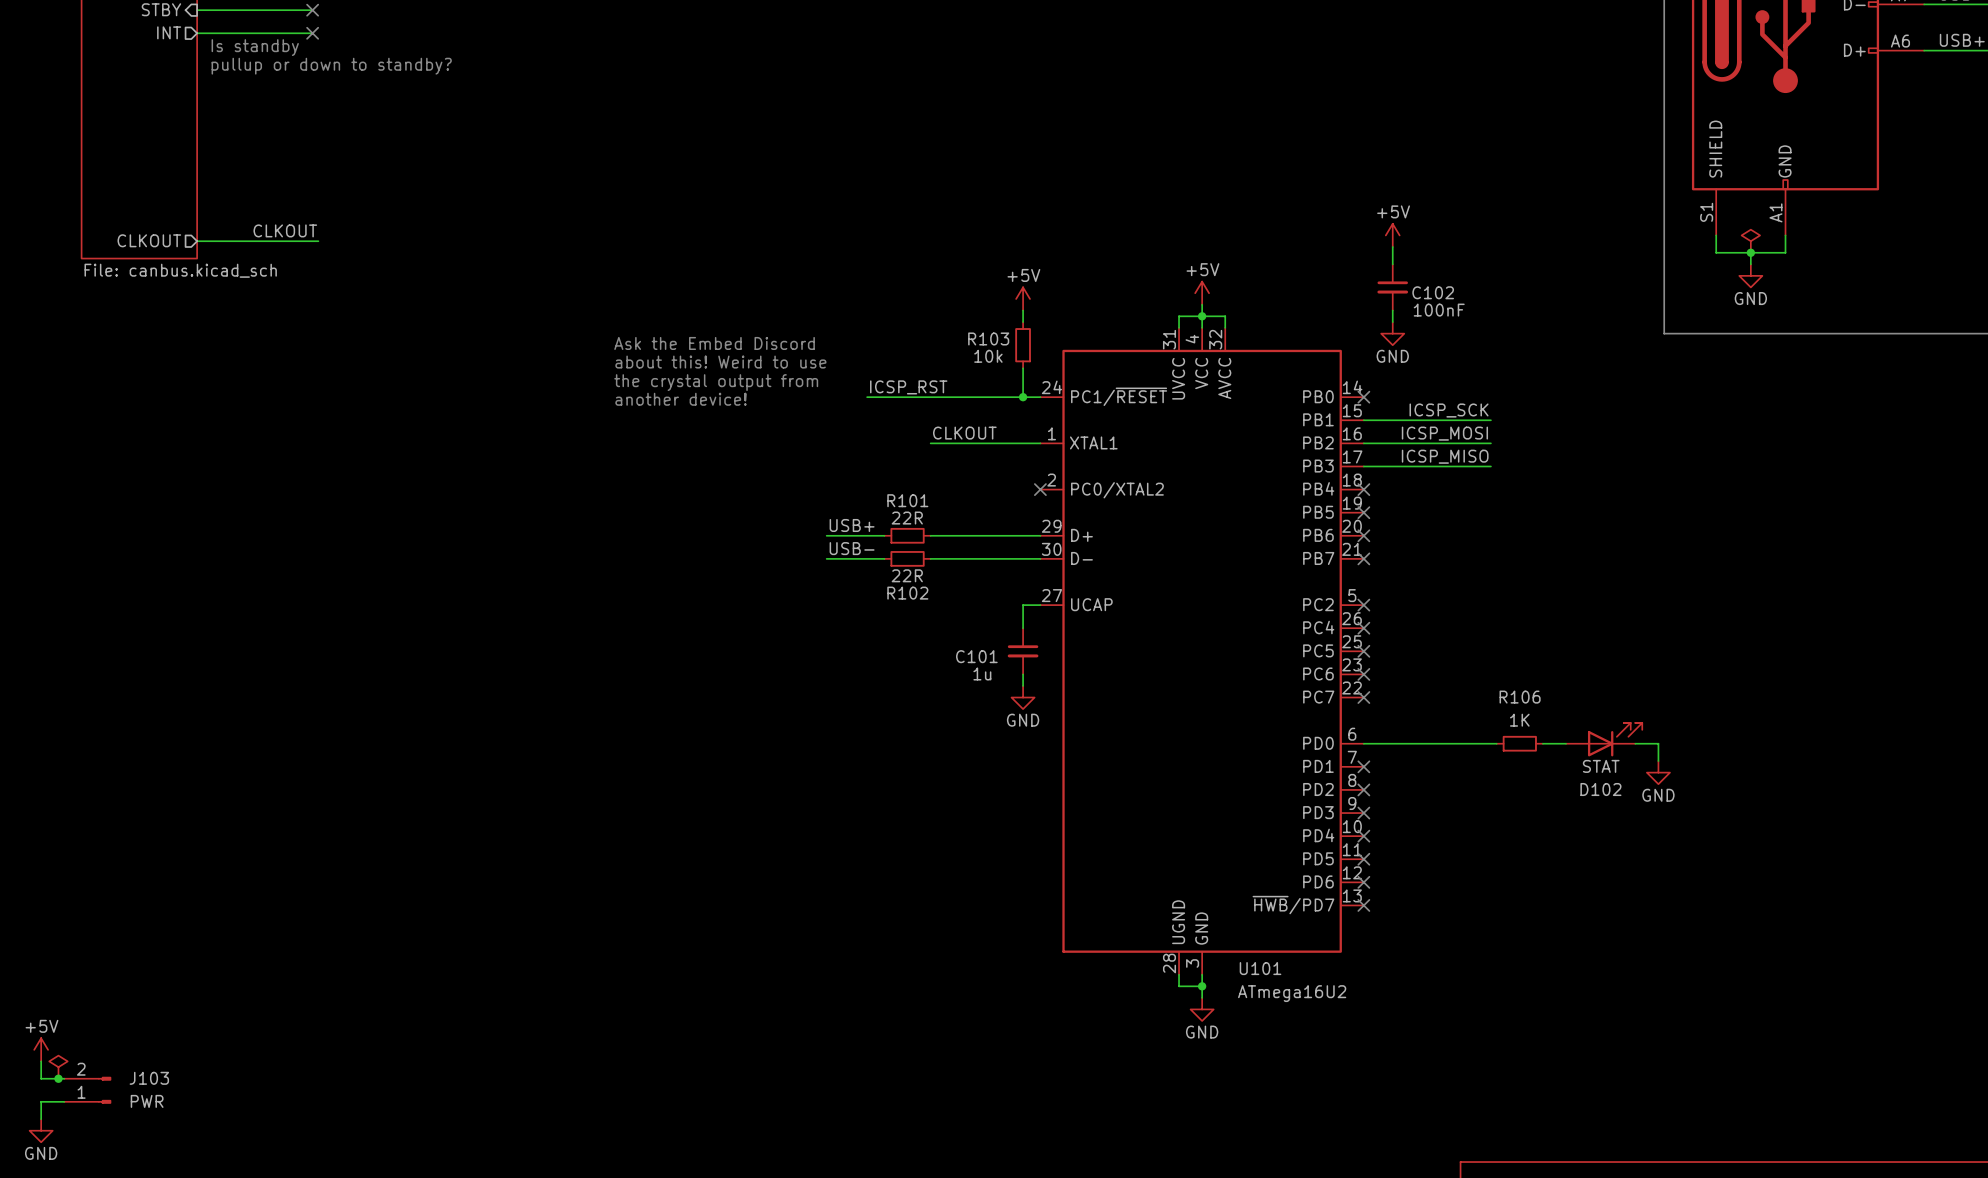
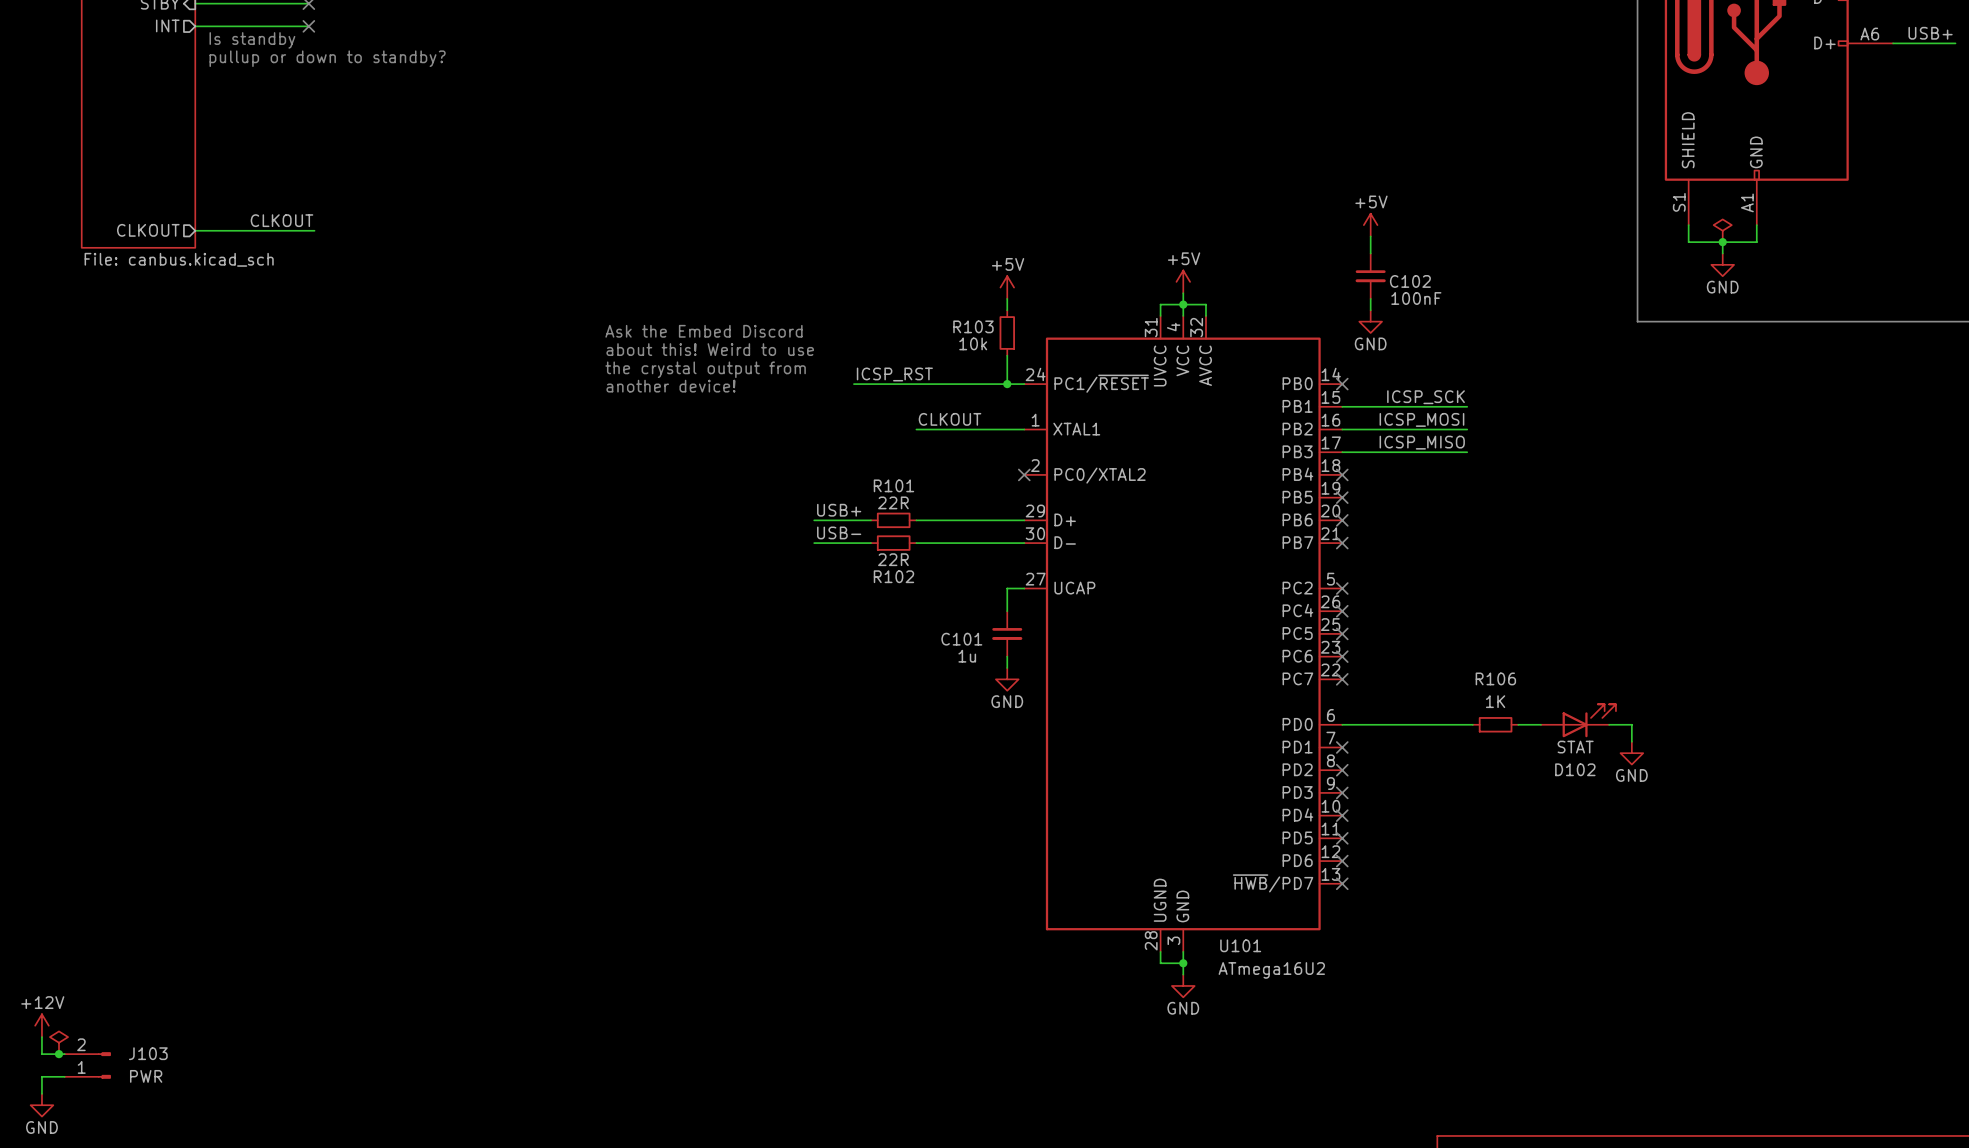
power symbol: +5V (41, 1049) -> +12V (41, 1025)

